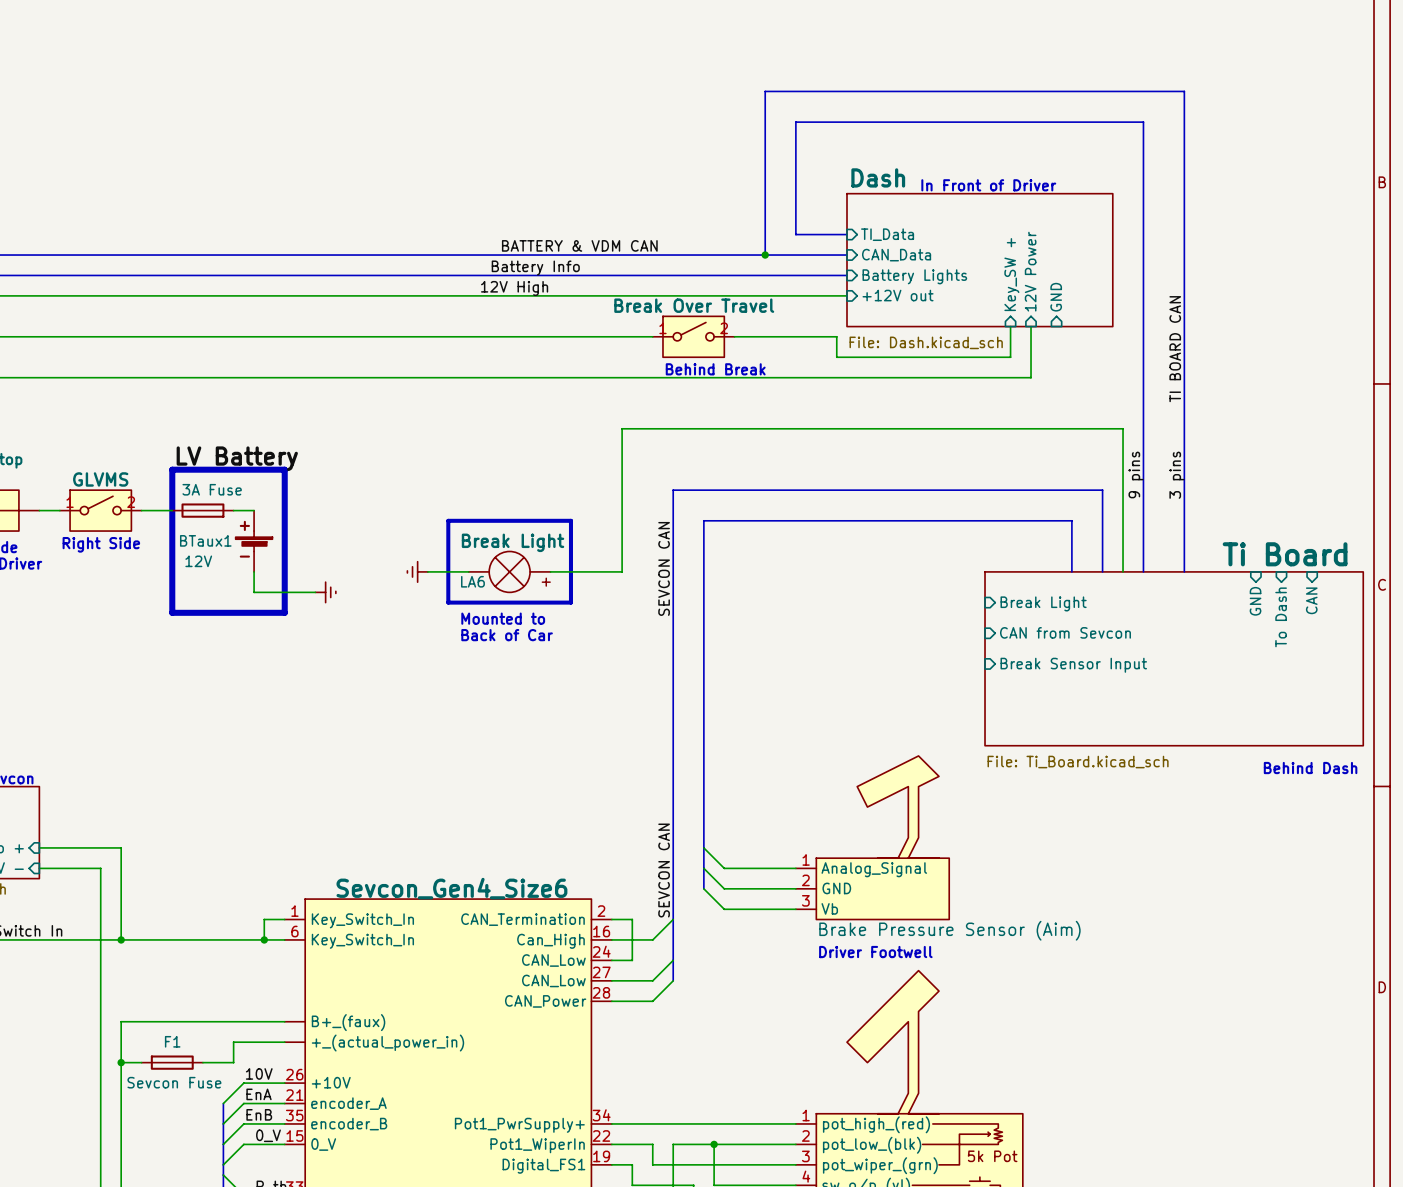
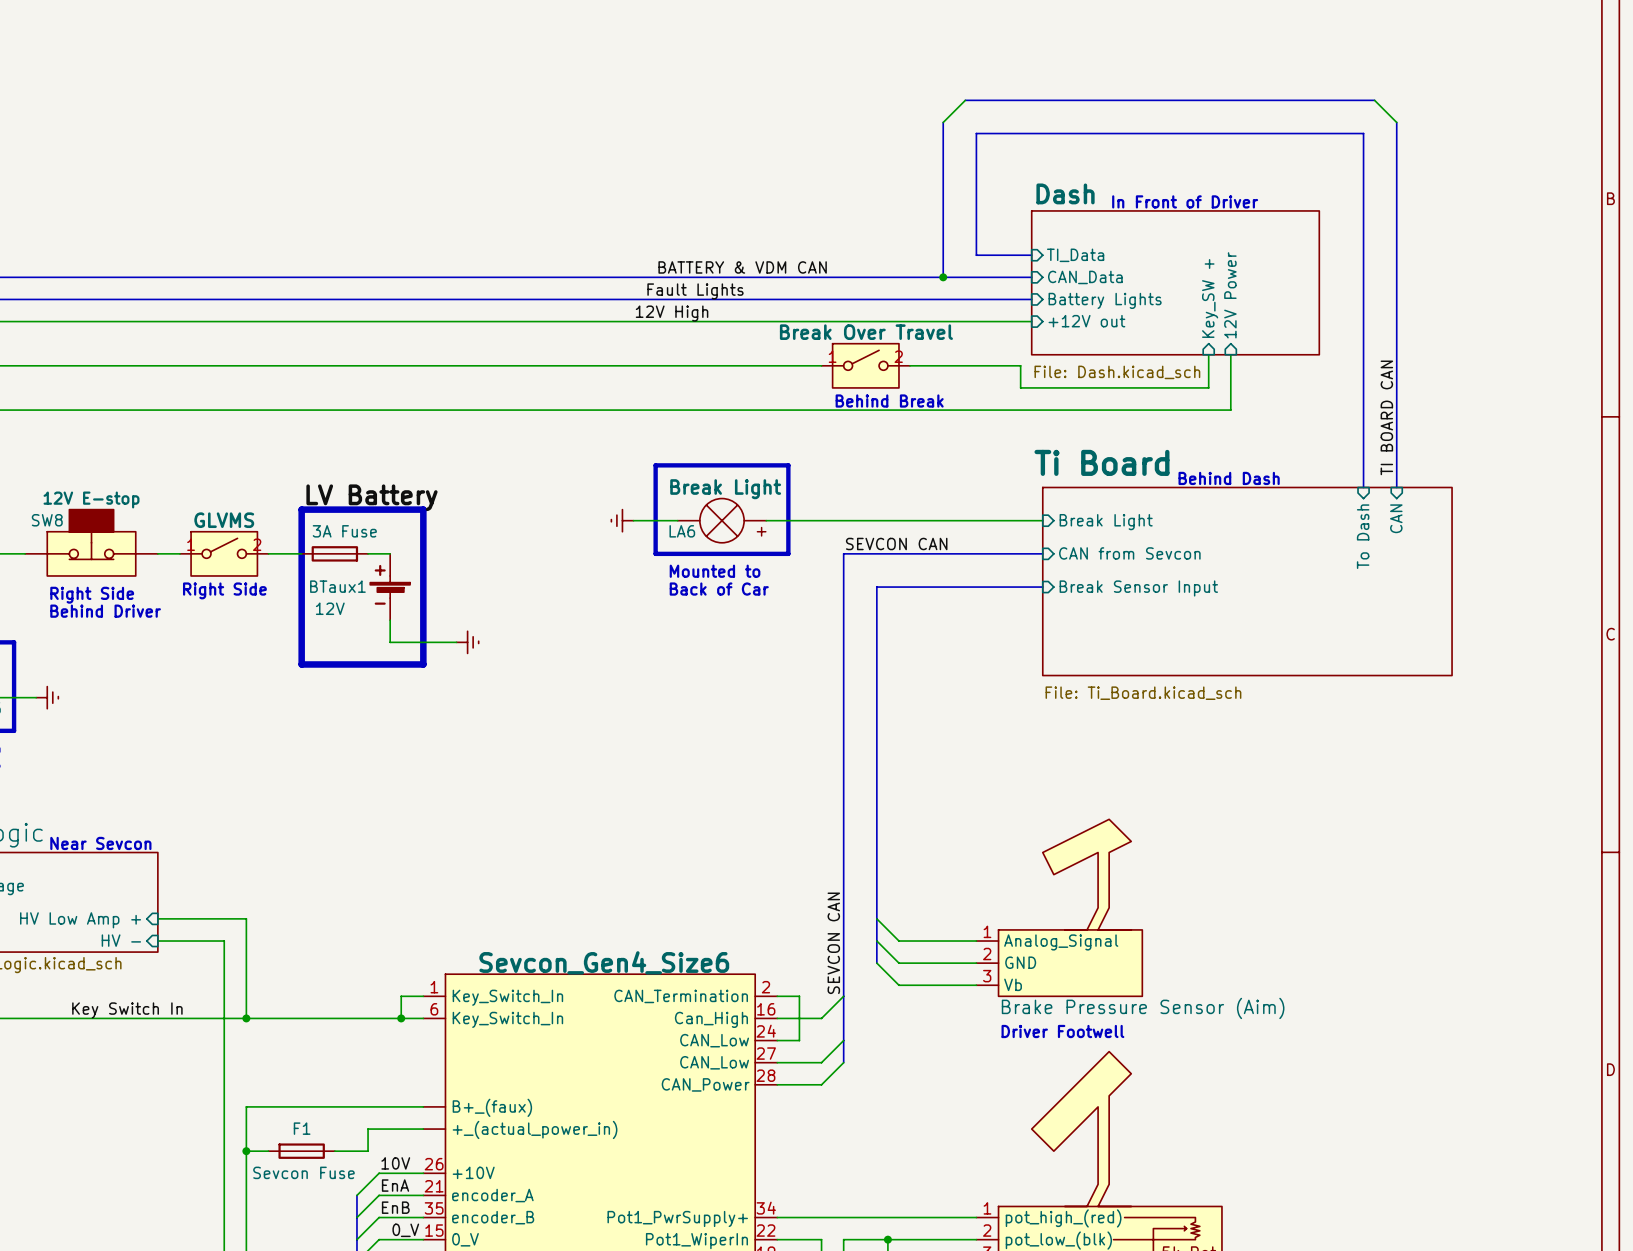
wire: none -> (965, 100) (943, 122)
bus: (785, 91) (765, 91) (765, 111) -> none
wire: none -> (1374, 100) (1396, 122)
bus: (1163, 91) (1184, 91) (1184, 111) -> none
bus: (1143, 122) (1143, 571) -> (1352, 133) (1363, 133) (1363, 487)
label: Battery Info (535, 268) -> Fault Lights (695, 291)
sheet pin: GND (1056, 297) -> none
label position: TI BOARD CAN (1175, 349) -> TI BOARD CAN (1386, 417)
text: none -> Behind Dash (1229, 478)
bus: (1184, 449) (1184, 571) -> none
label: 9 pins (1136, 474) -> none
label: 3 pins (1176, 475) -> none
wire: none -> (766, 520) (1042, 520)
bus: (673, 510) (673, 490) (1102, 490) (1102, 571) -> (843, 553) (1042, 553)
line: (448, 520) (570, 520) (570, 602) (448, 602) (448, 520) -> (655, 465) (788, 465) (788, 553) (655, 553) (655, 465)
bus: (703, 541) (703, 520) (1071, 520) (1071, 571) -> (876, 587) (1042, 587)
sheet Ti Board name position: Ti Board (1285, 554) -> Ti Board (1101, 462)
label rotation: 0° (664, 568) -> 90° clockwise (896, 543)
power symbol position: (417, 571) -> (622, 520)
wire: (427, 571) (468, 571) -> (633, 520) (677, 520)
LA6 position: (509, 571) -> (722, 520)
wire: (550, 571) (622, 571) (622, 428) (1123, 428) (1123, 571) -> none
sheet pin position: CAN (1311, 600) -> CAN (1396, 518)
sheet pin: GND (1255, 601) -> none
sheet pin position: Break Light (1043, 603) -> Break Light (1106, 522)
sheet pin position: To Dash (1281, 617) -> To Dash (1363, 536)
text position: Mounted to (503, 618) -> Mounted to (715, 571)
sheet pin position: CAN from Sevcon (1065, 632) -> CAN from Sevcon (1129, 553)
text position: Back of Car (507, 635) -> Back of Car (719, 589)
sheet Ti Board position: (1174, 658) -> (1247, 581)
sheet pin position: Break Sensor Input (1073, 665) -> Break Sensor Input (1138, 588)
text: Behind Dash (1310, 768) -> none

